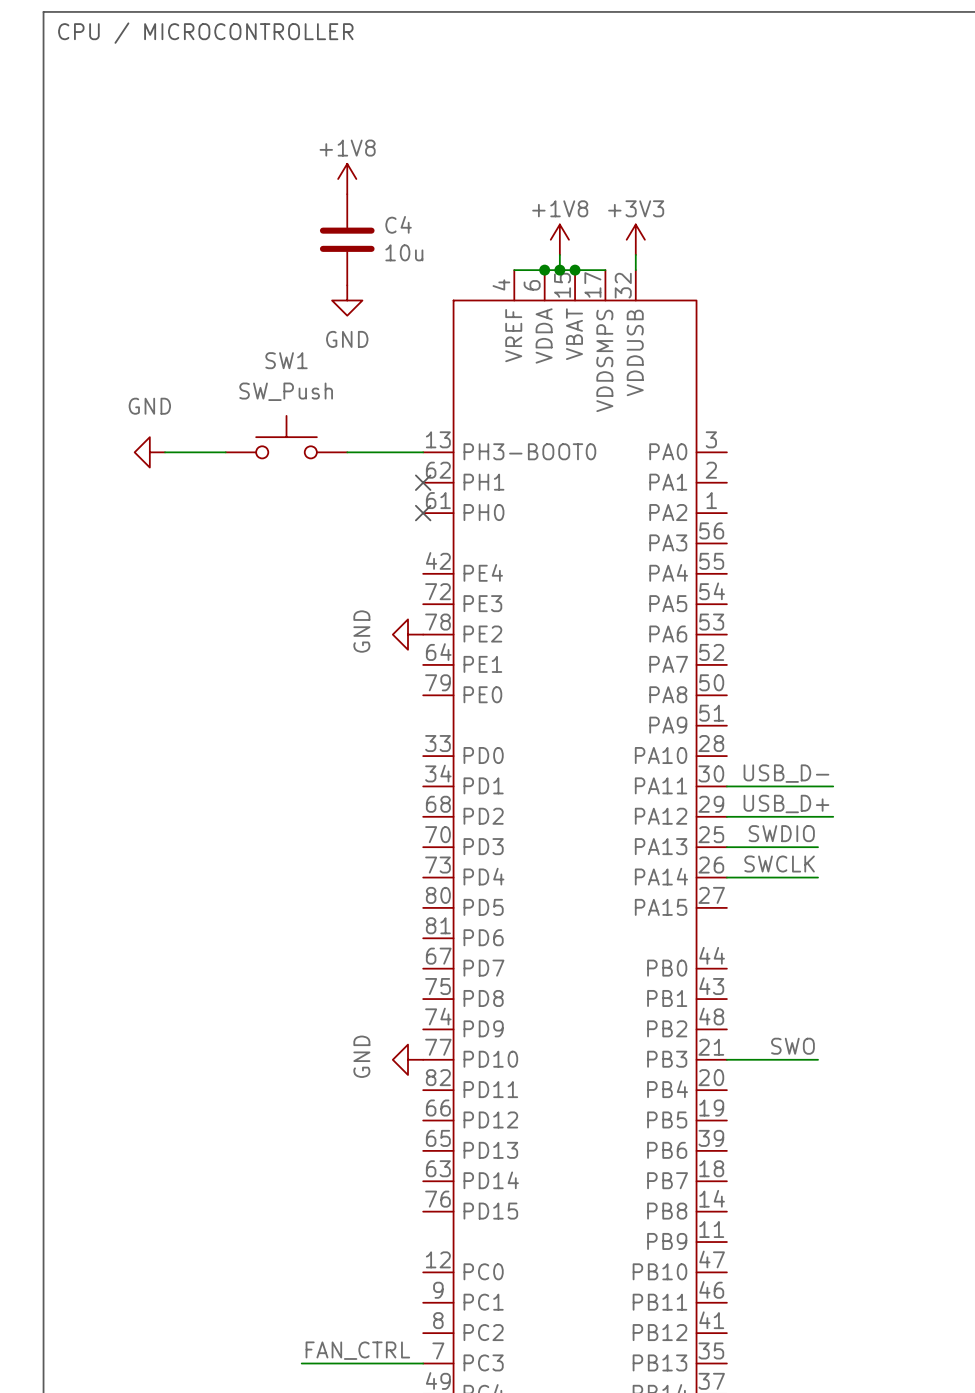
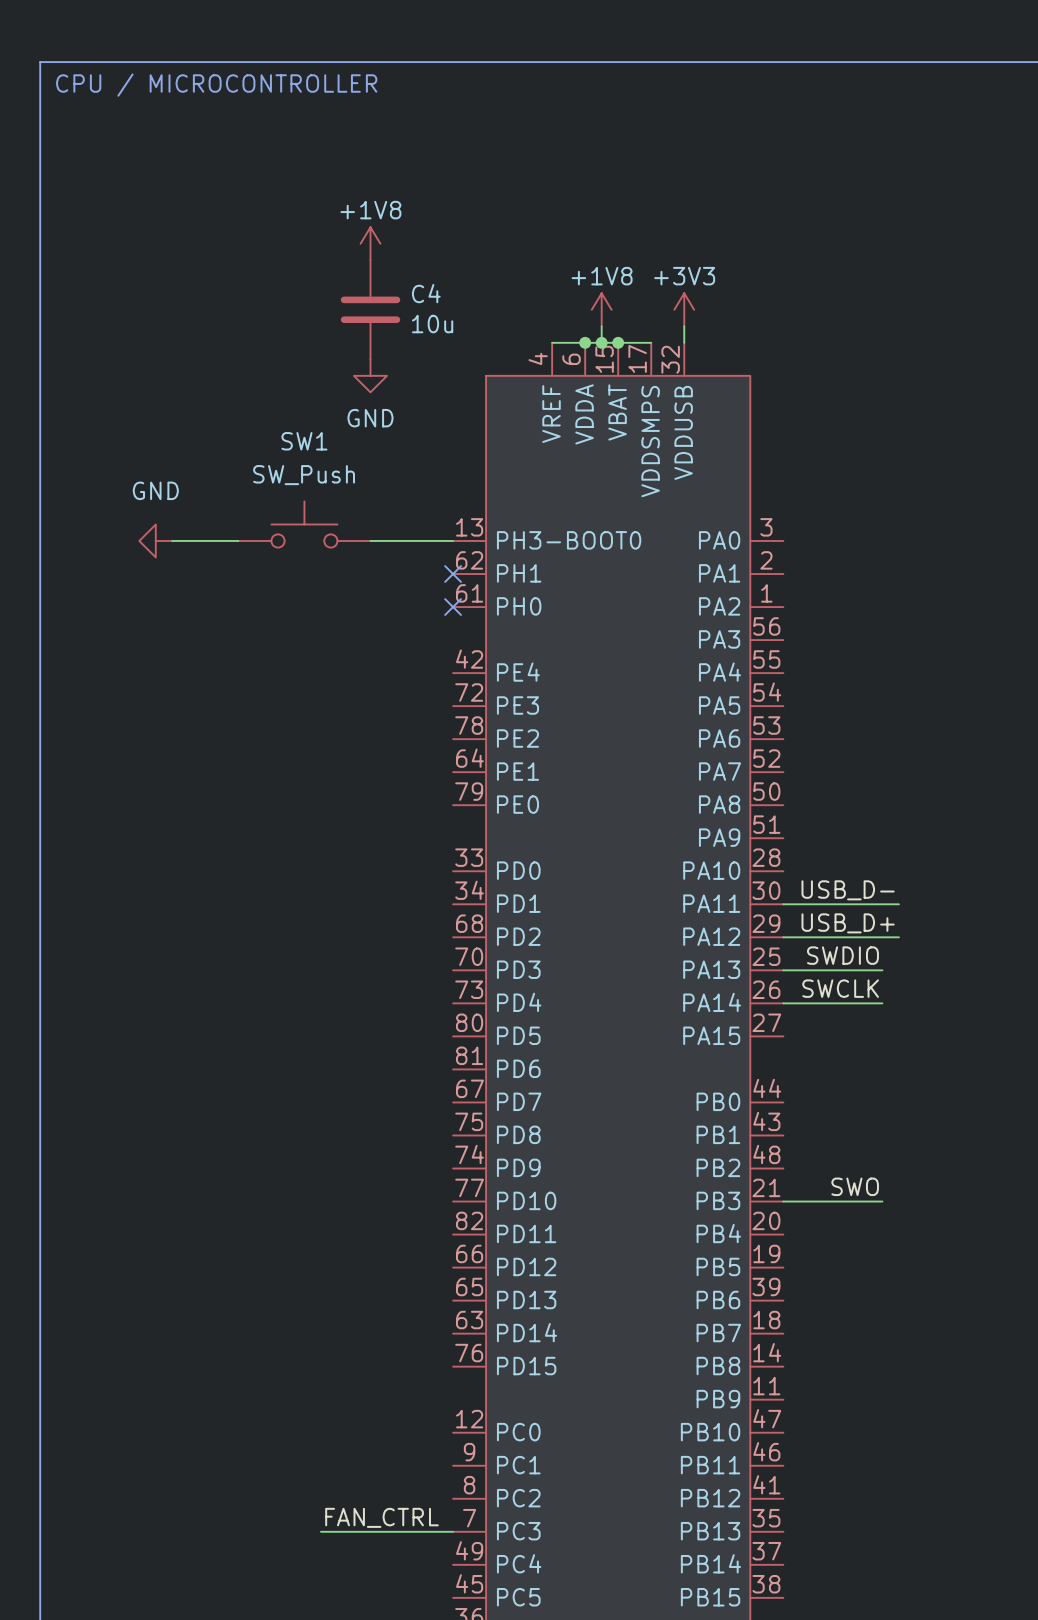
power symbol: GND (408, 634) -> none
power symbol: GND (408, 1059) -> none

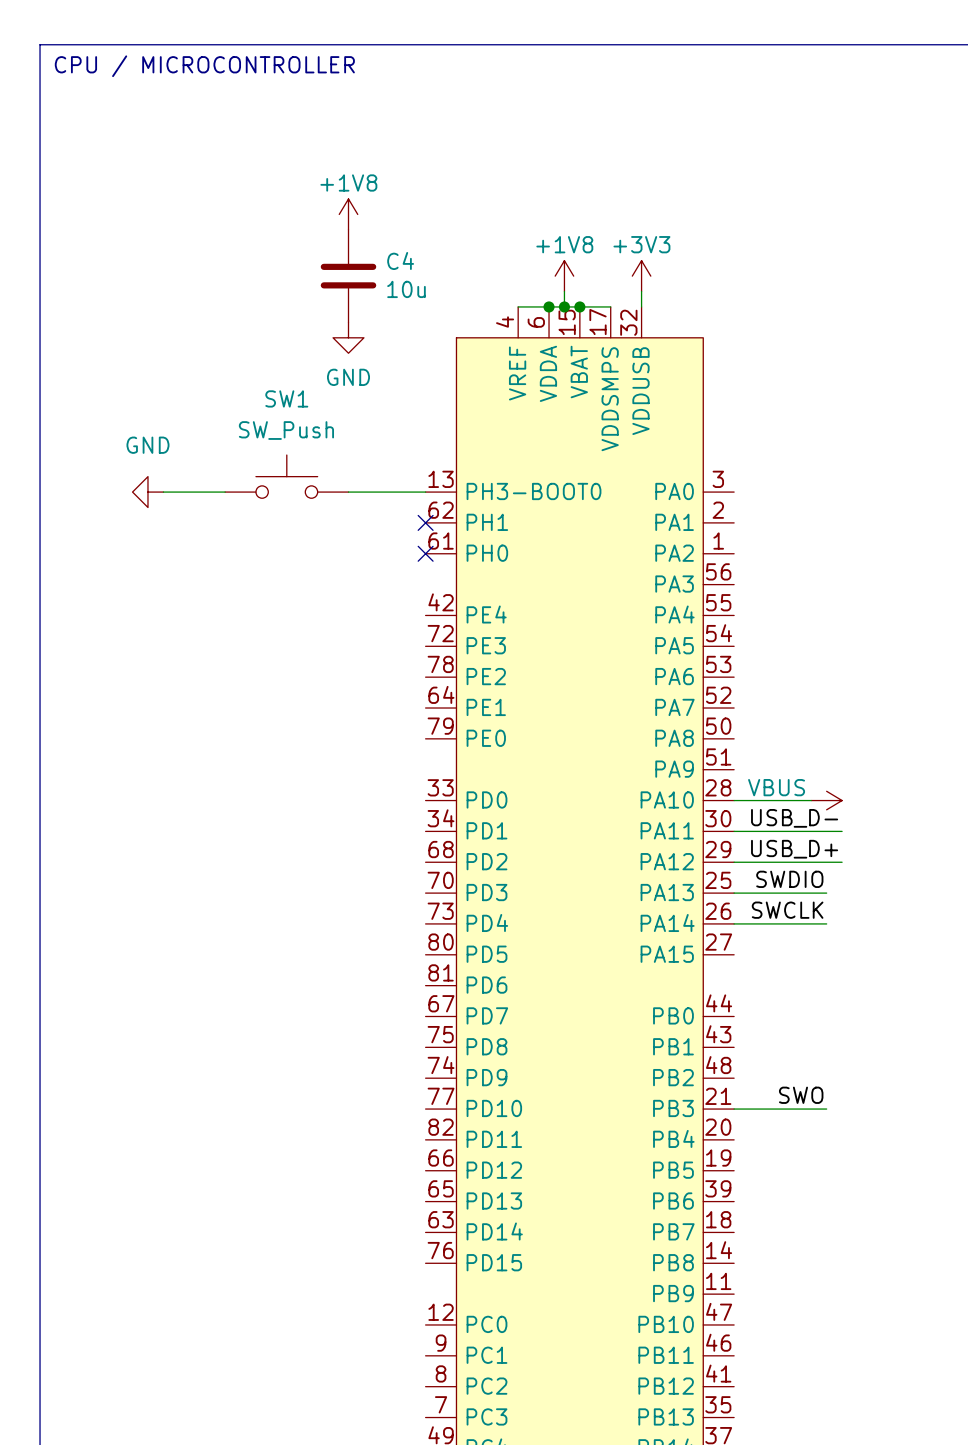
wire: none -> (734, 800) (811, 800)
power symbol: none -> VBUS (826, 800)
label: FAN_CTRL (382, 1517) -> none
wire: (320, 1531) (453, 1531) -> none

